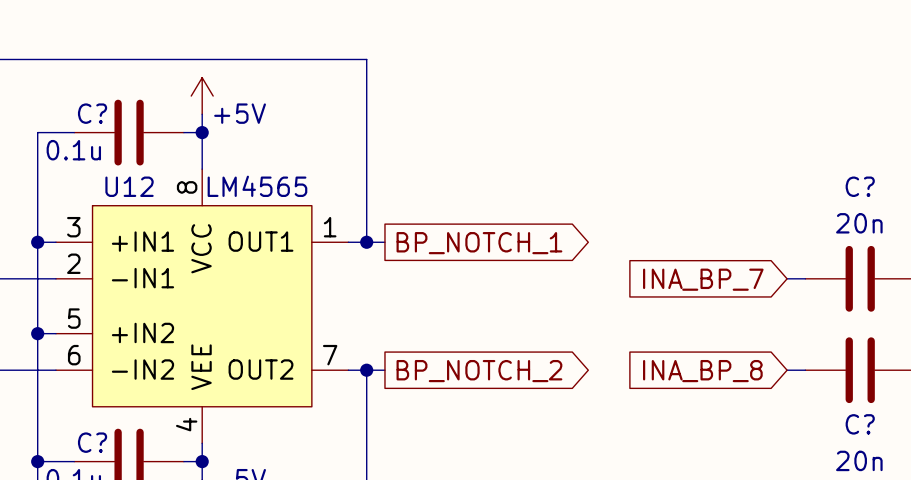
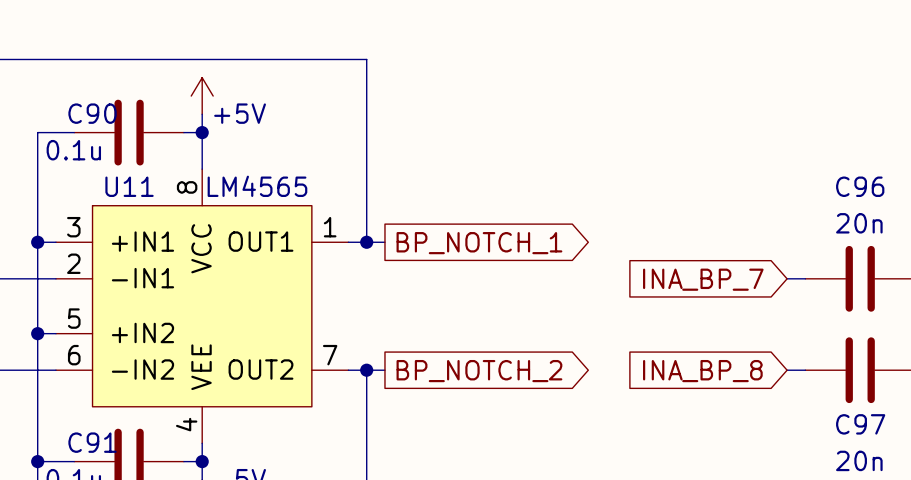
C? name: C? (92, 113) -> C90 (92, 113)
U12 name: U12 (129, 186) -> U11 (129, 186)
C? name: C? (860, 186) -> C96 (860, 186)
C? name: C? (860, 424) -> C97 (860, 424)
C? name: C? (92, 442) -> C91 (92, 442)

